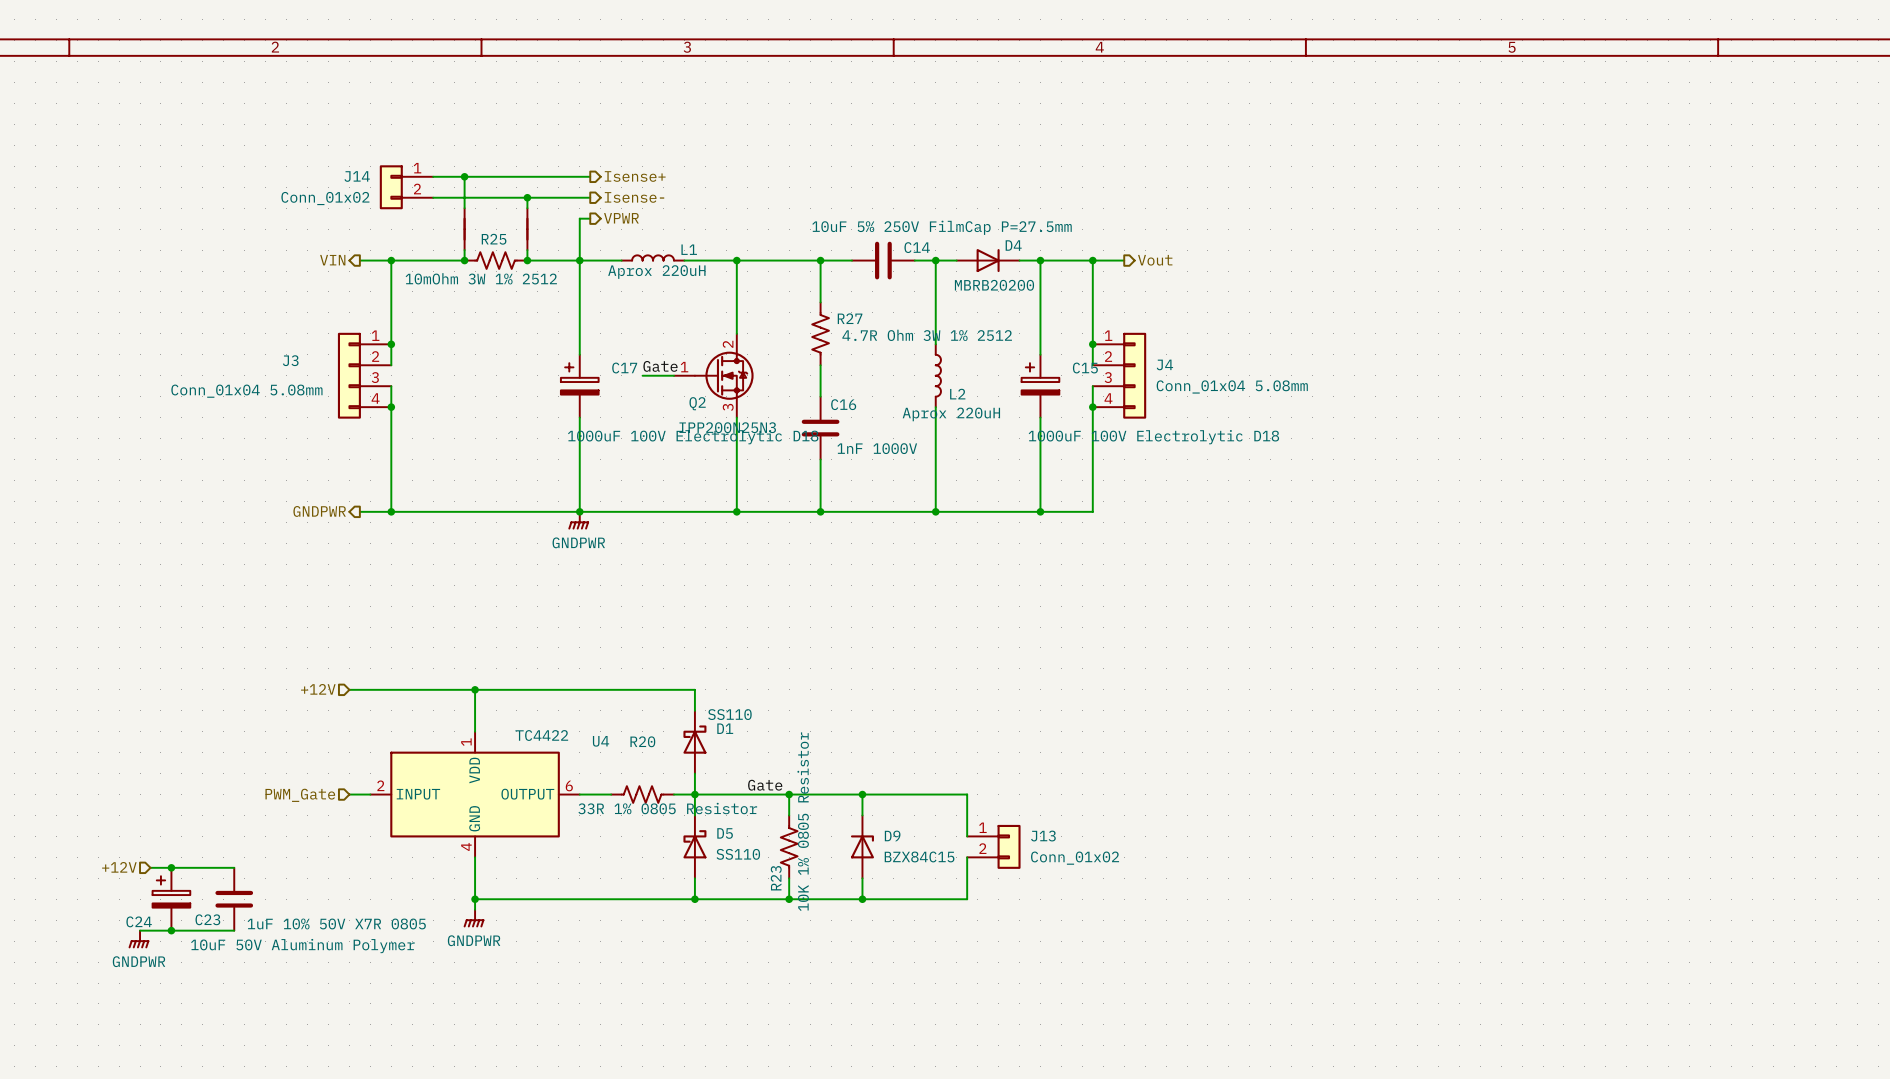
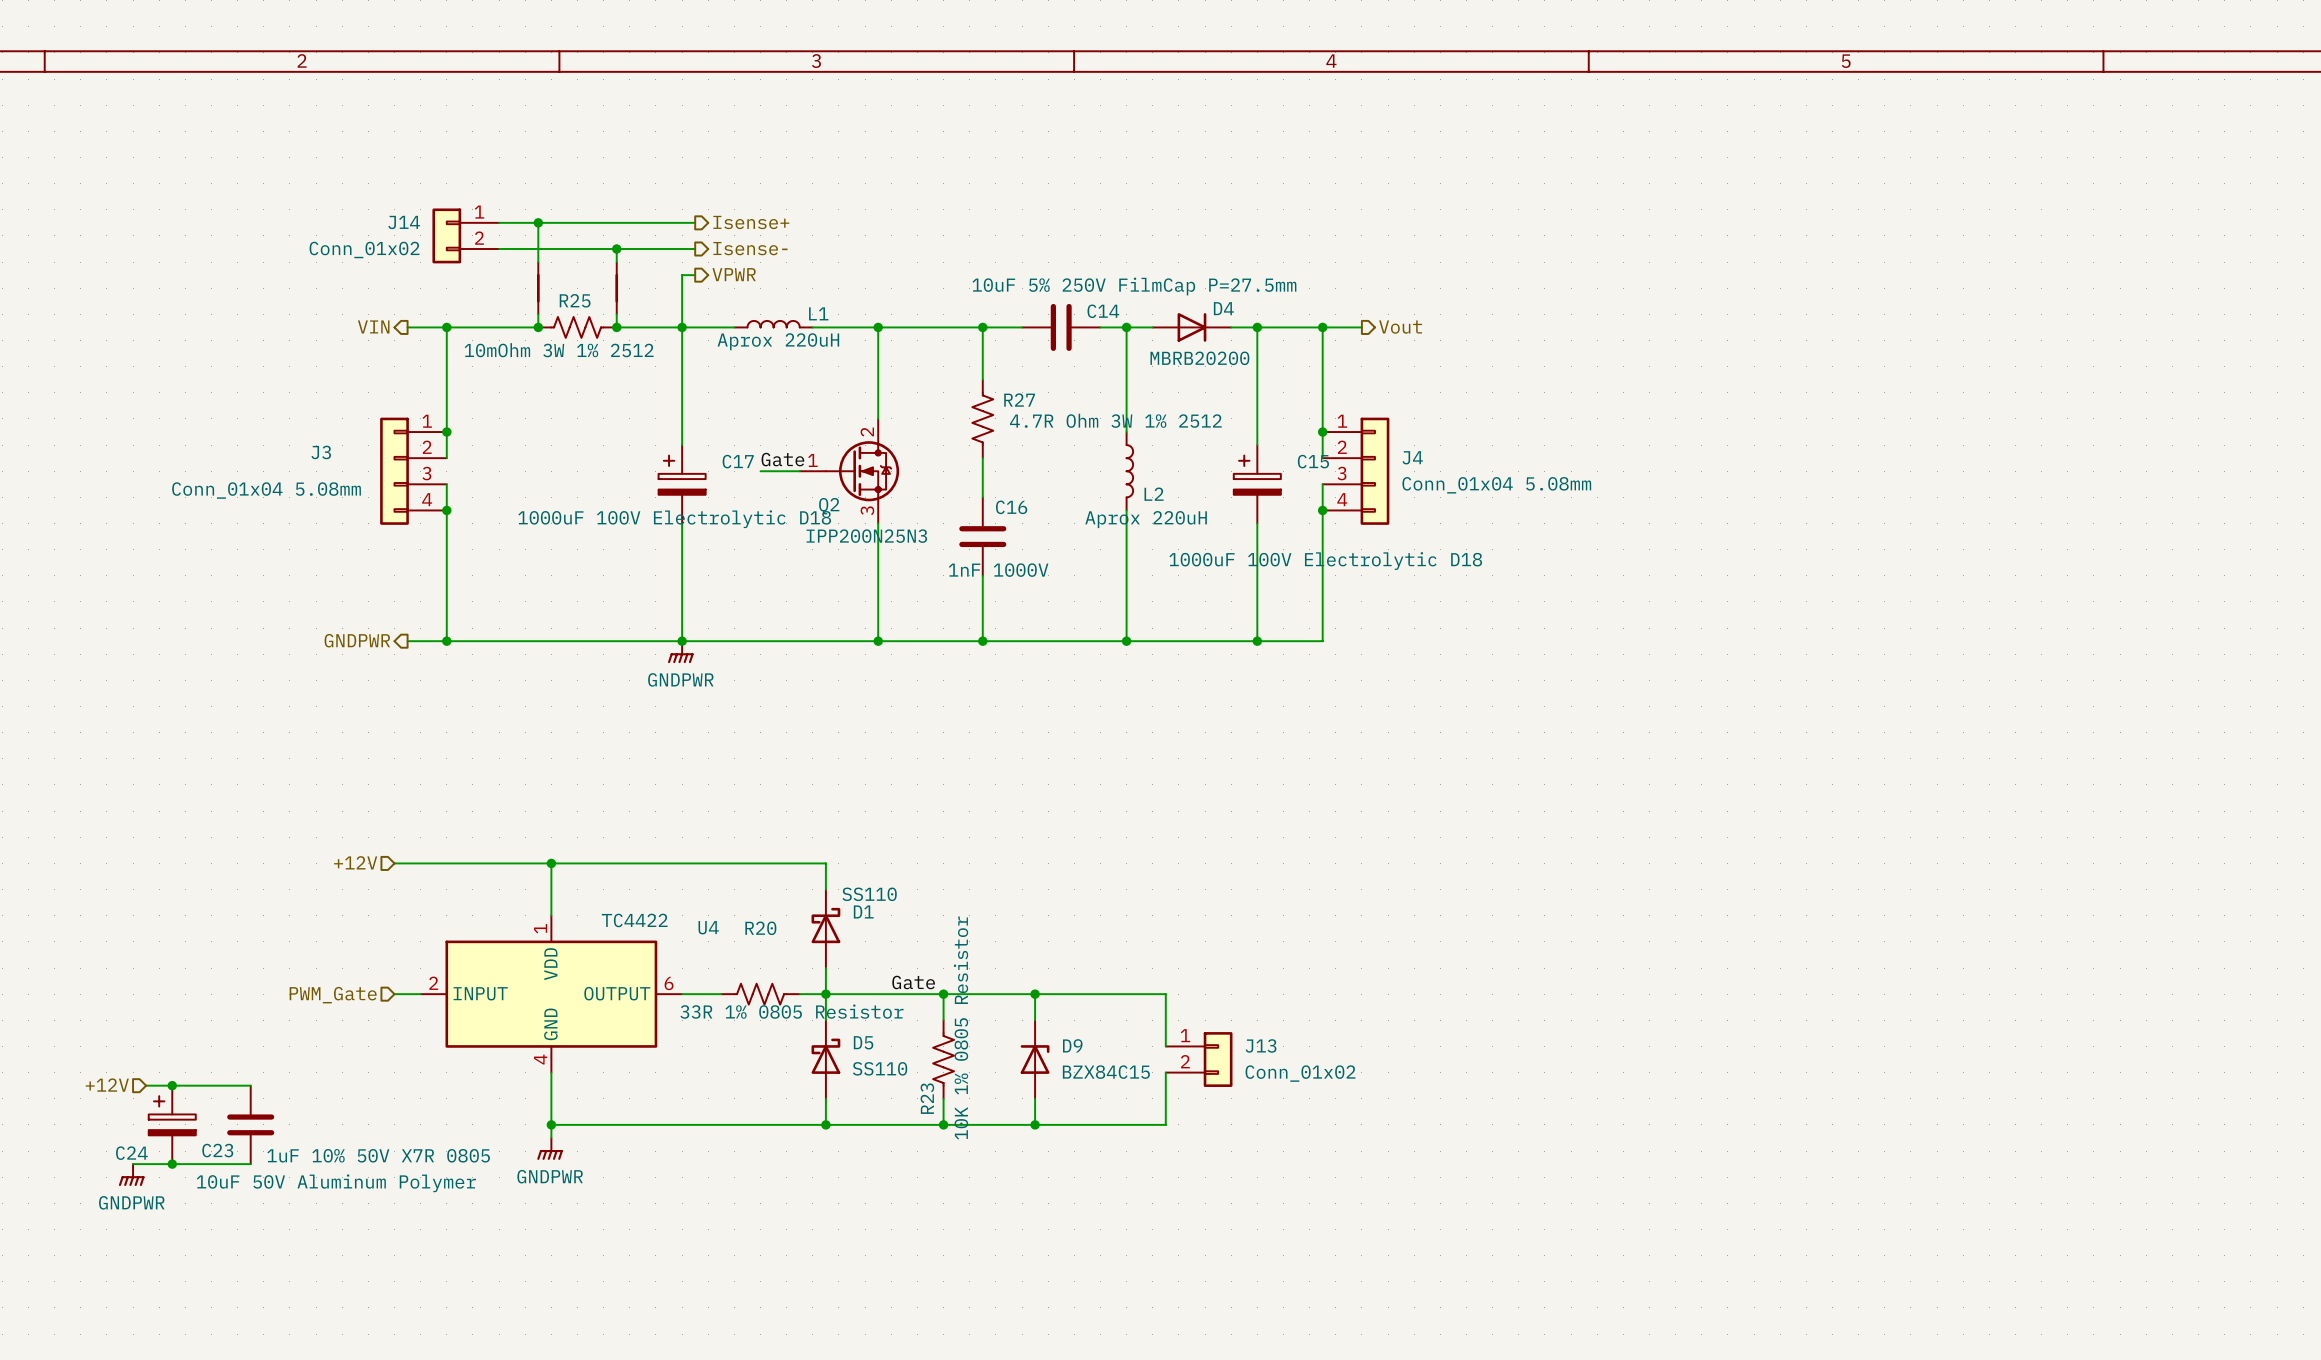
C17 value position: 1000uF 100V Electrolytic D18 (693, 437) -> 1000uF 100V Electrolytic D18 (674, 519)
C15 value position: 1000uF 100V Electrolytic D18 (1153, 437) -> 1000uF 100V Electrolytic D18 (1325, 561)
C16 value position: 1nF 1000V (877, 448) -> 1nF 1000V (998, 570)

